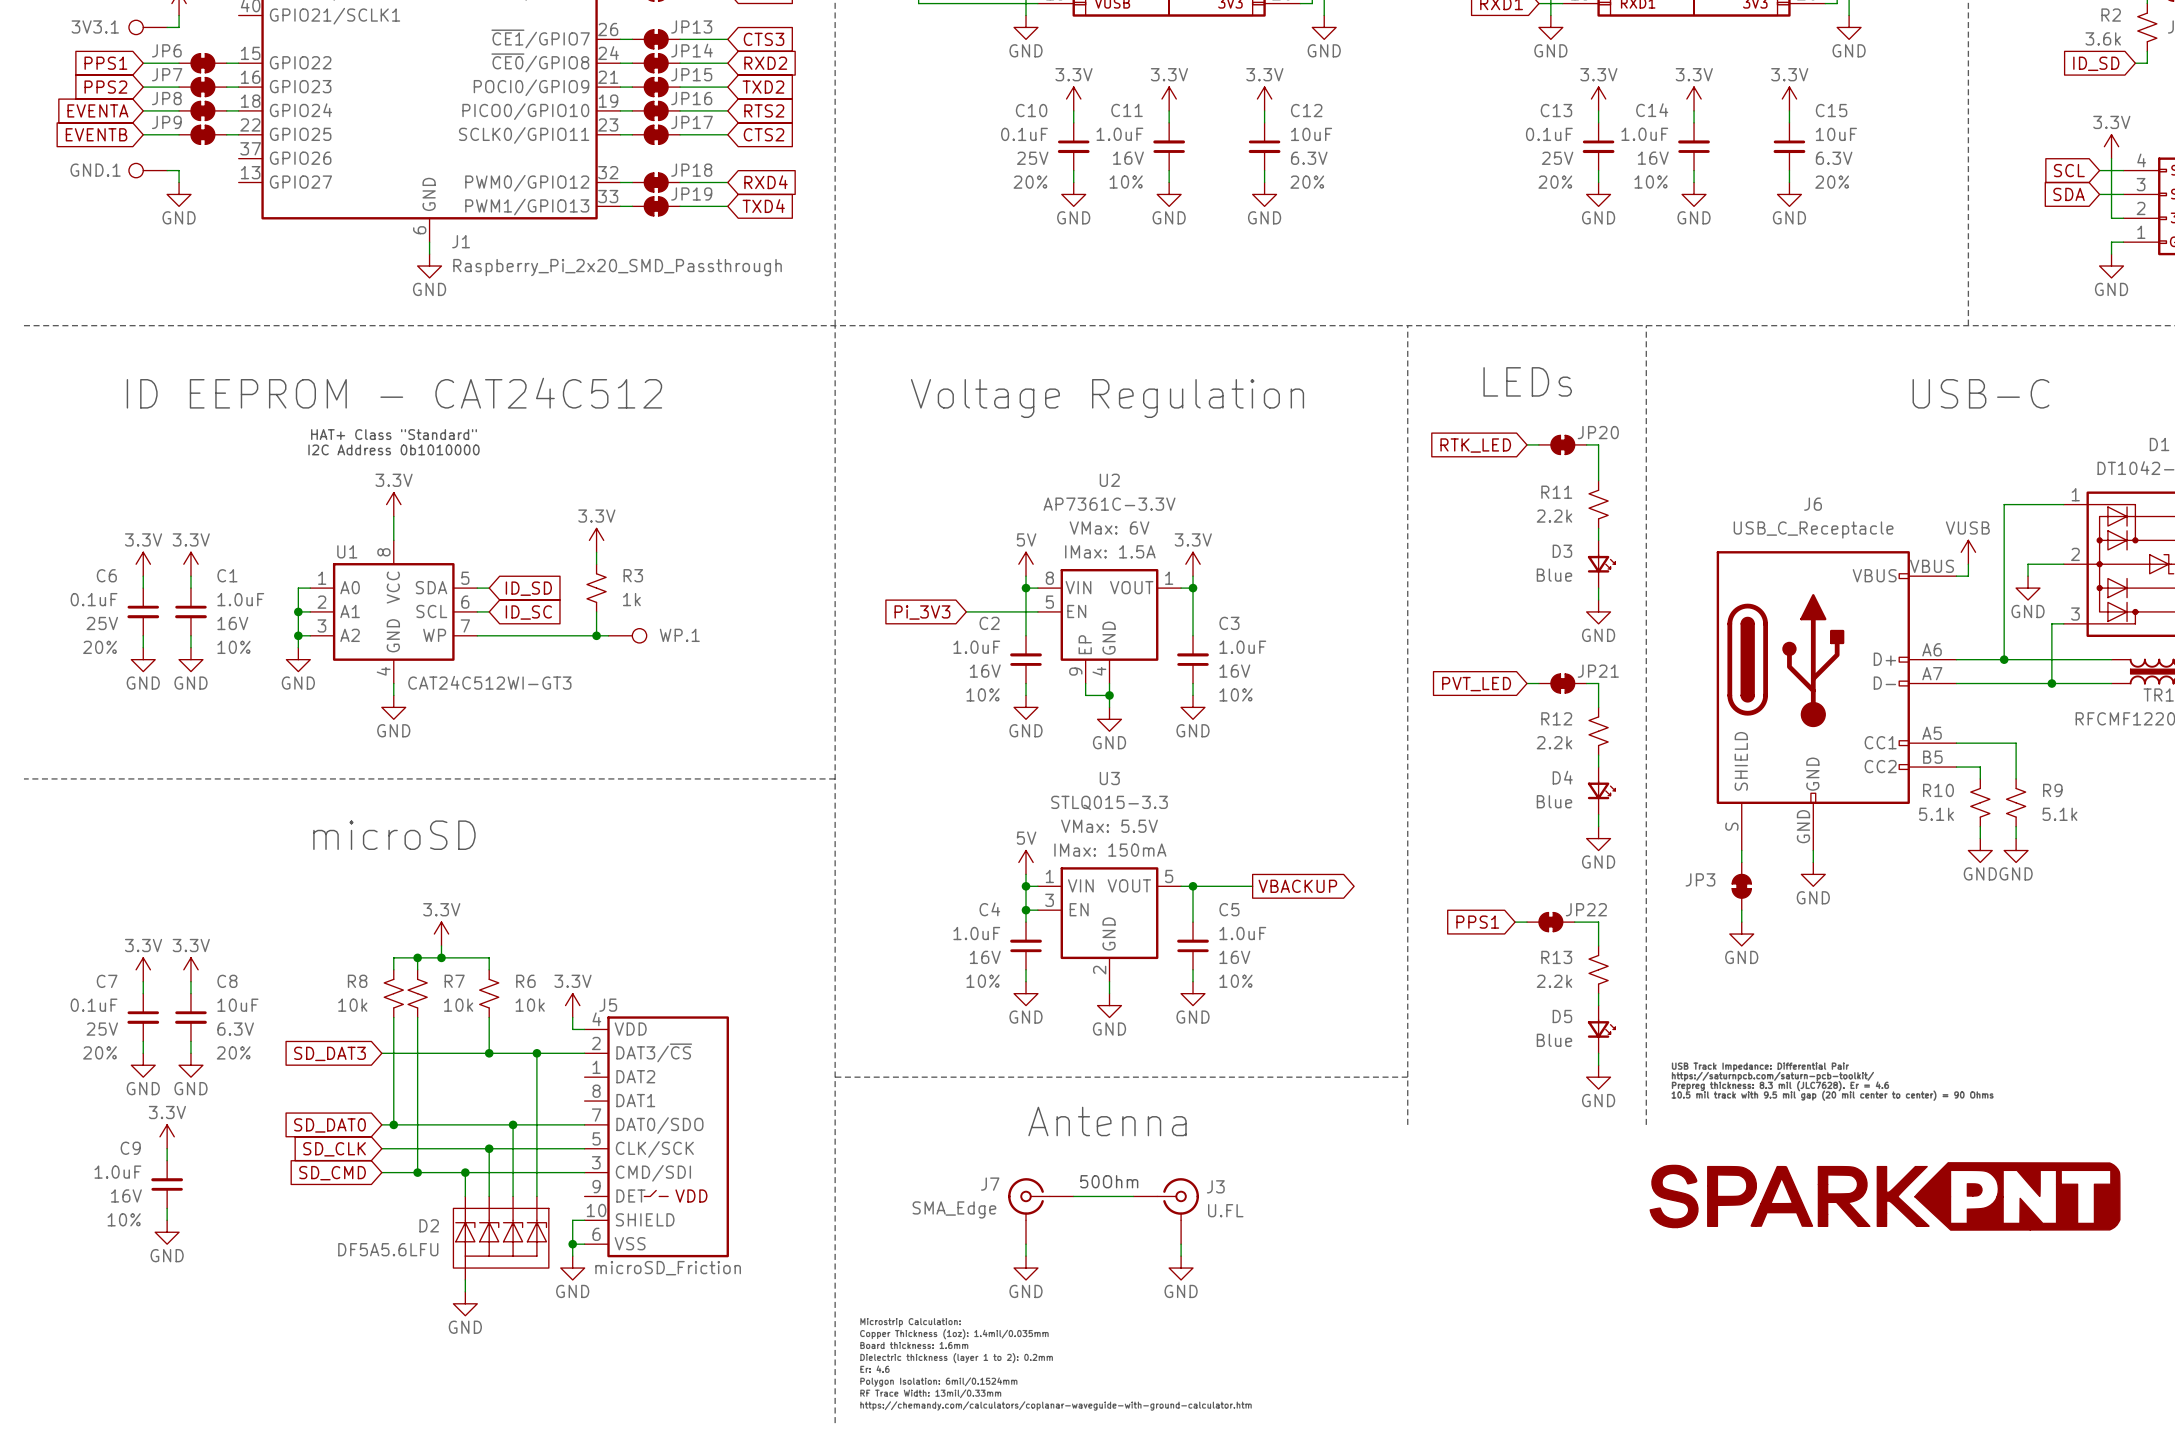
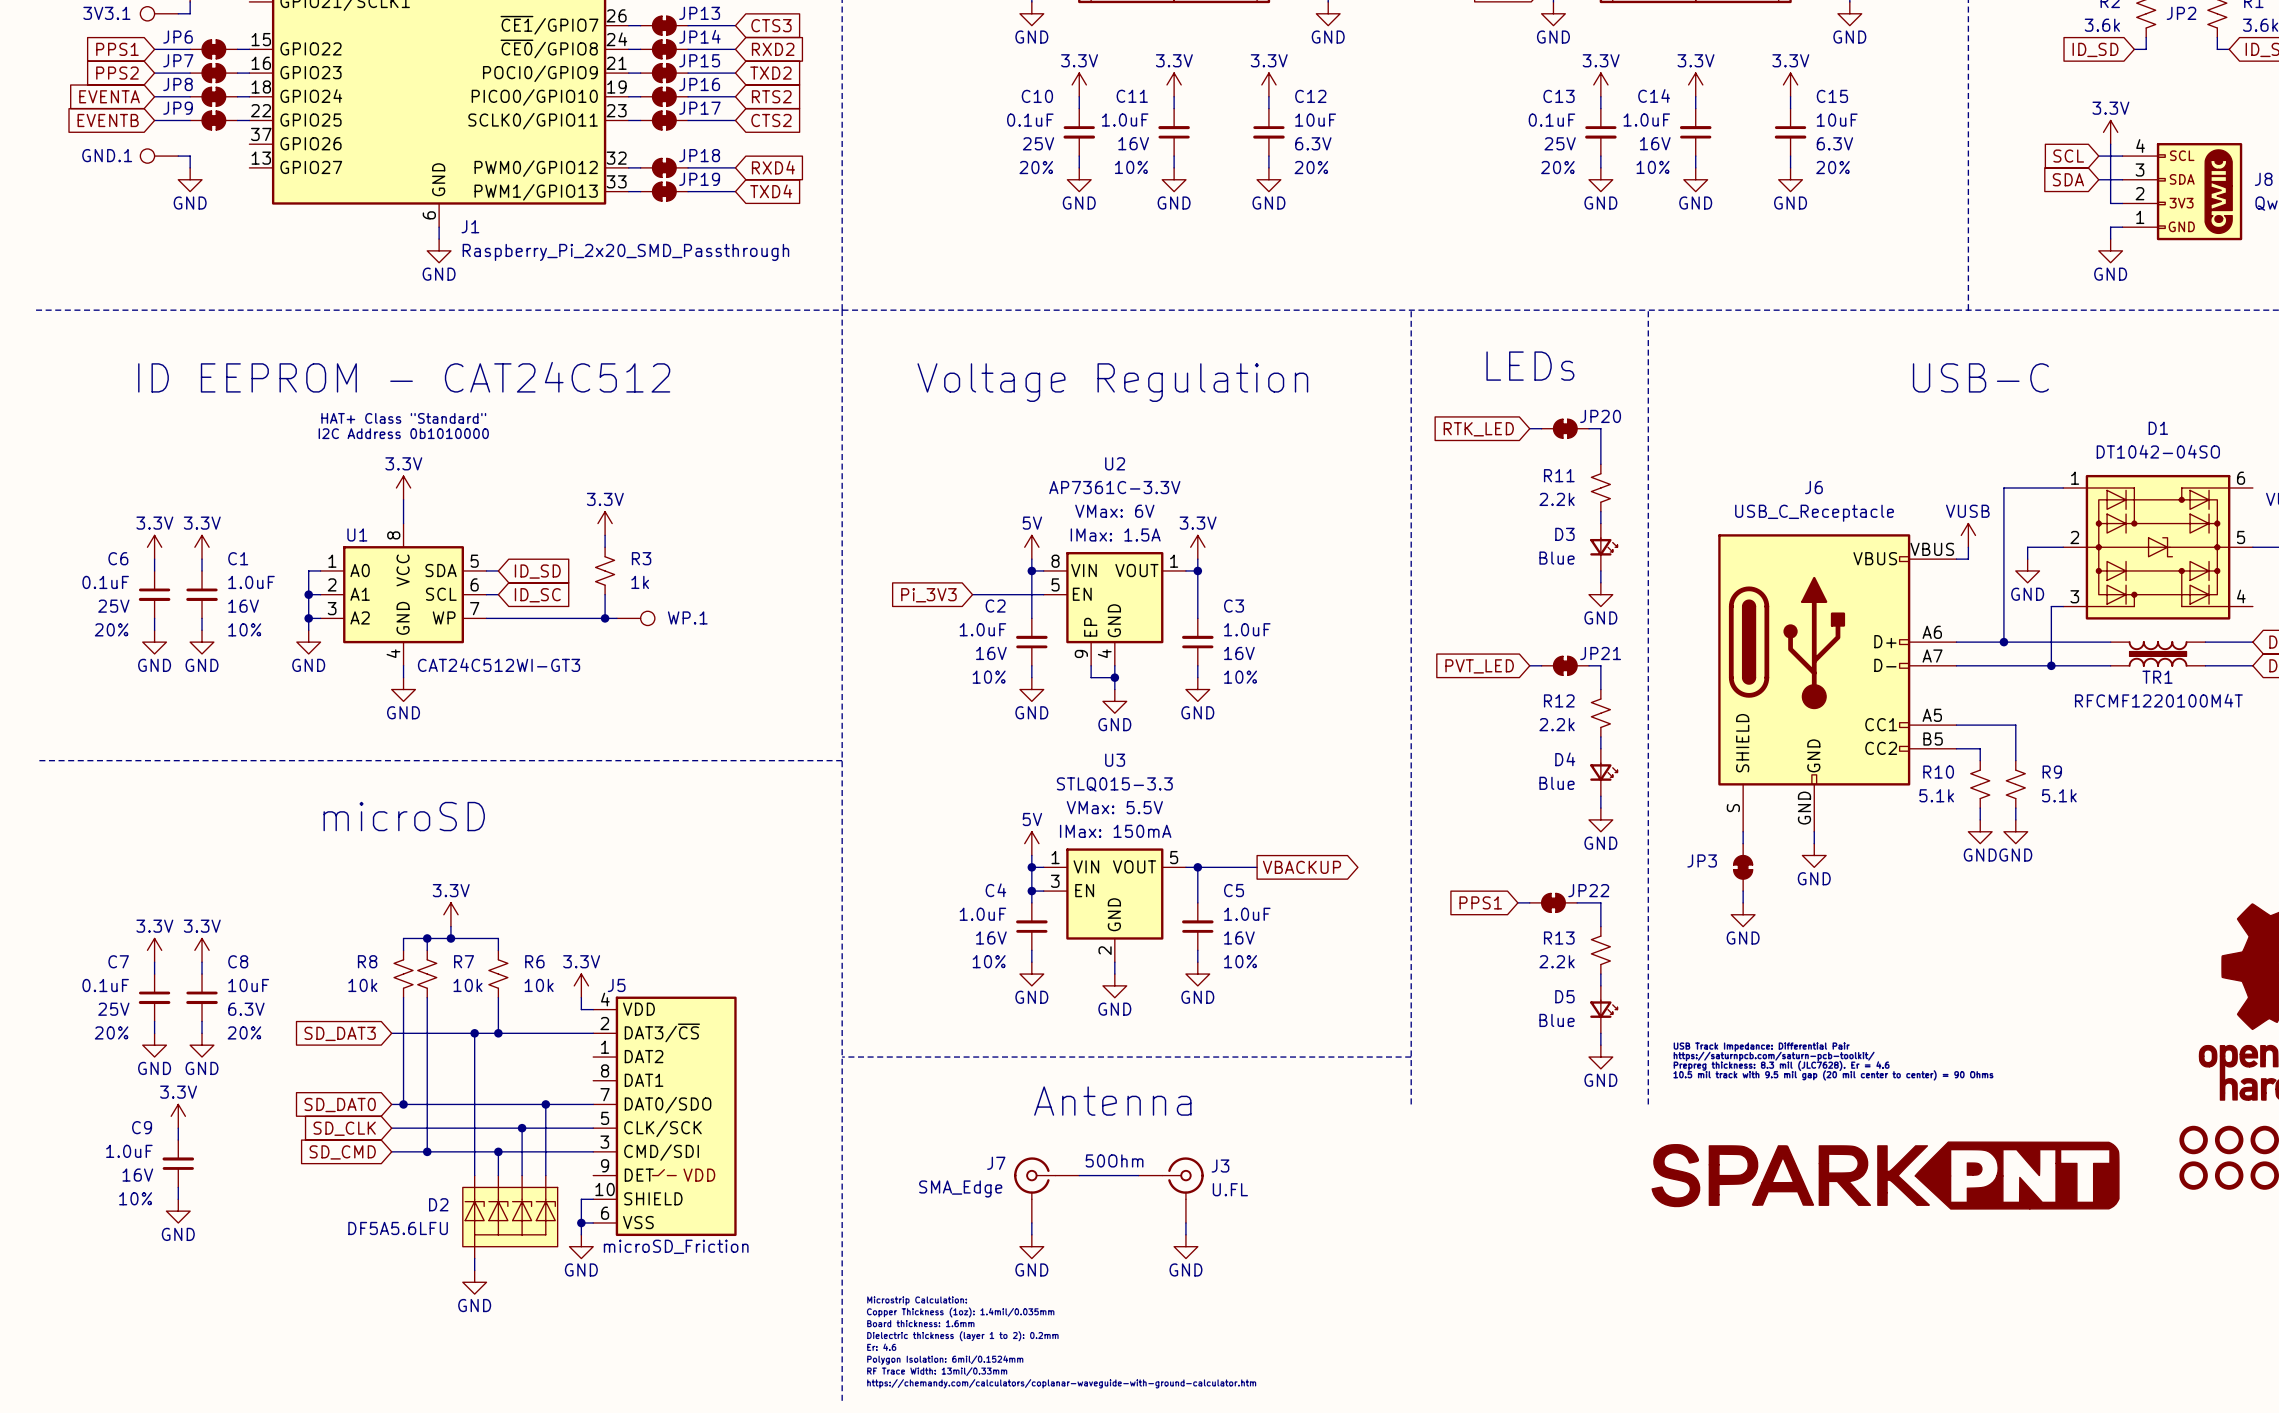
wire: none -> (474, 1033) (474, 1151)
junction: none -> (474, 1033)
wire: (536, 1053) (536, 1124) -> none
junction: (536, 1053) -> none
wire: (513, 1124) (513, 1148) -> none
junction: (513, 1124) -> none
junction: none -> (545, 1104)
wire: (489, 1148) (489, 1172) -> none
junction: (489, 1148) -> none
junction: none -> (522, 1128)
junction: (465, 1172) -> none
junction: none -> (498, 1151)

